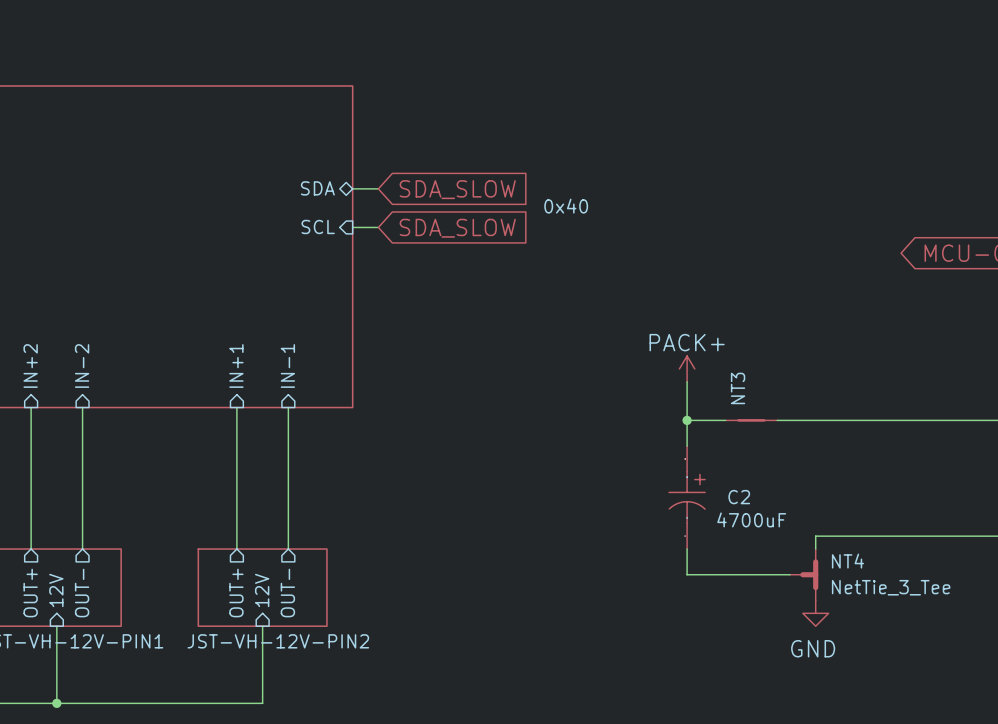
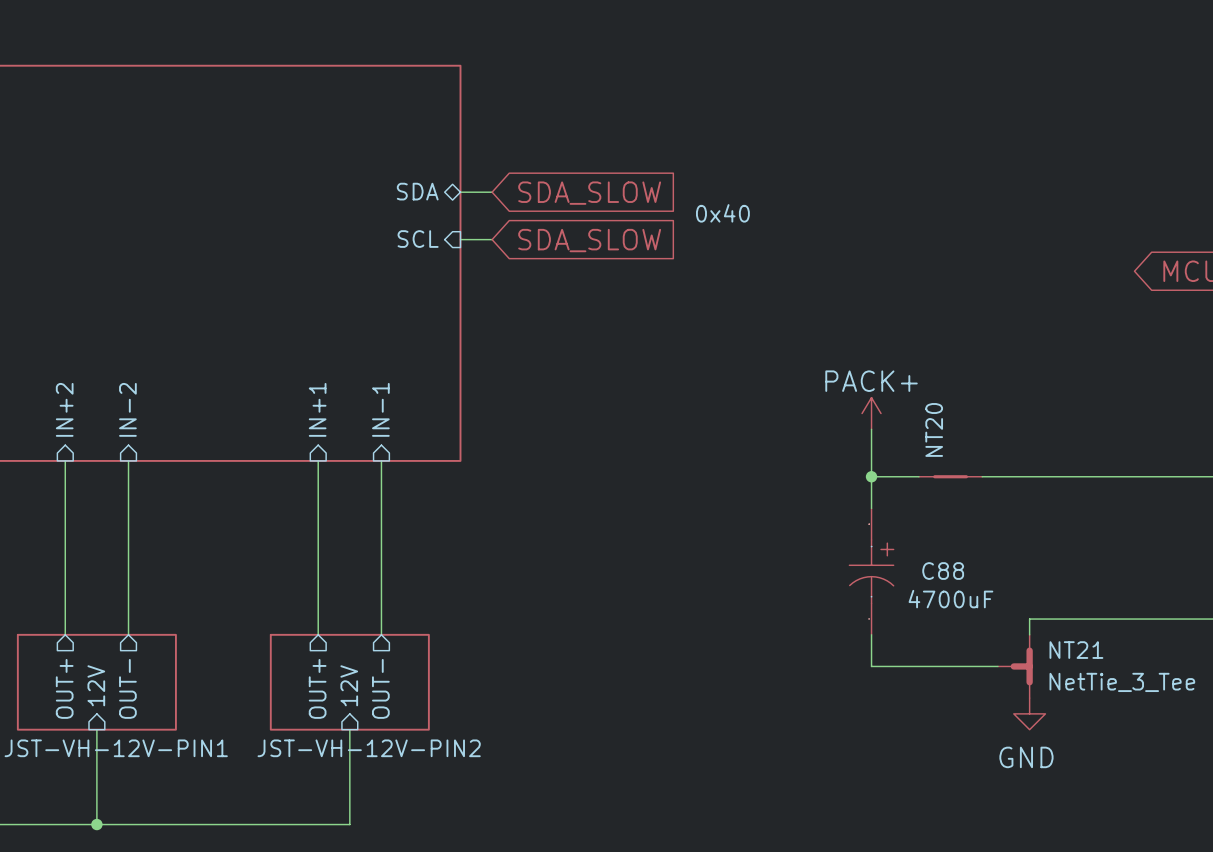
NT3 name: NT3 (738, 388) -> NT20 (934, 429)
C2 name: C2 (739, 497) -> C88 (943, 571)
NT4 name: NT4 (847, 561) -> NT21 (1076, 650)

